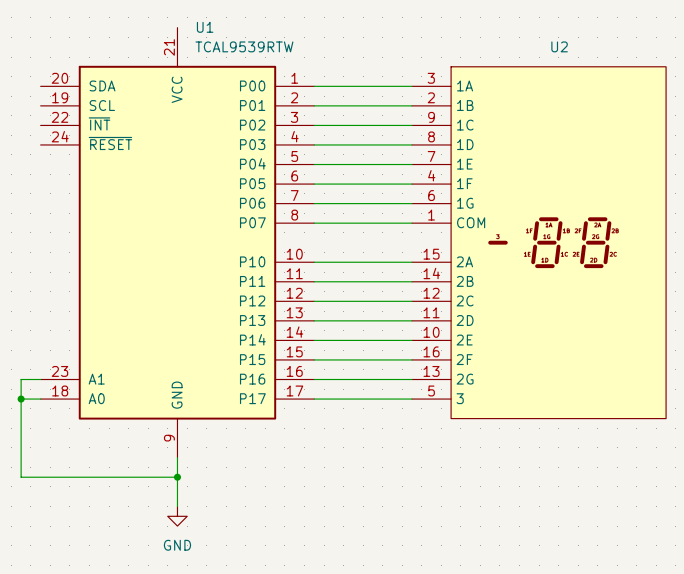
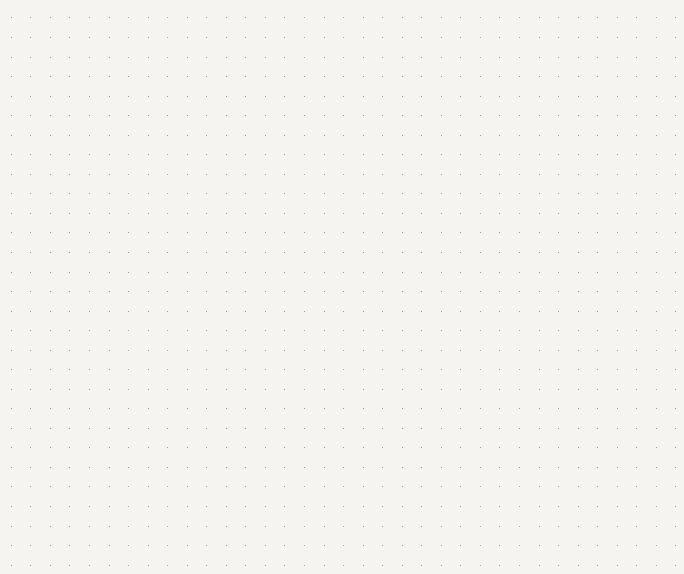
wire: (314, 86) (411, 86) -> none
wire: (314, 105) (411, 105) -> none
wire: (314, 125) (411, 125) -> none
wire: (314, 144) (411, 144) -> none
wire: (314, 164) (411, 164) -> none
wire: (314, 184) (411, 184) -> none
wire: (314, 203) (411, 203) -> none
wire: (314, 223) (411, 223) -> none
U1: TCAL9539RTW (177, 242) -> none
U2: (539, 242) -> none
wire: (314, 262) (411, 262) -> none
wire: (314, 281) (411, 281) -> none
wire: (314, 301) (411, 301) -> none
wire: (314, 320) (411, 320) -> none
wire: (314, 340) (411, 340) -> none
wire: (314, 359) (411, 359) -> none
wire: (40, 379) (21, 379) (21, 477) (177, 477) -> none
wire: (314, 379) (411, 379) -> none
wire: (21, 399) (40, 399) -> none
junction: (21, 399) -> none
wire: (314, 399) (411, 399) -> none
wire: (177, 457) (177, 506) -> none
junction: (177, 477) -> none
power symbol: GND (177, 516) -> none

